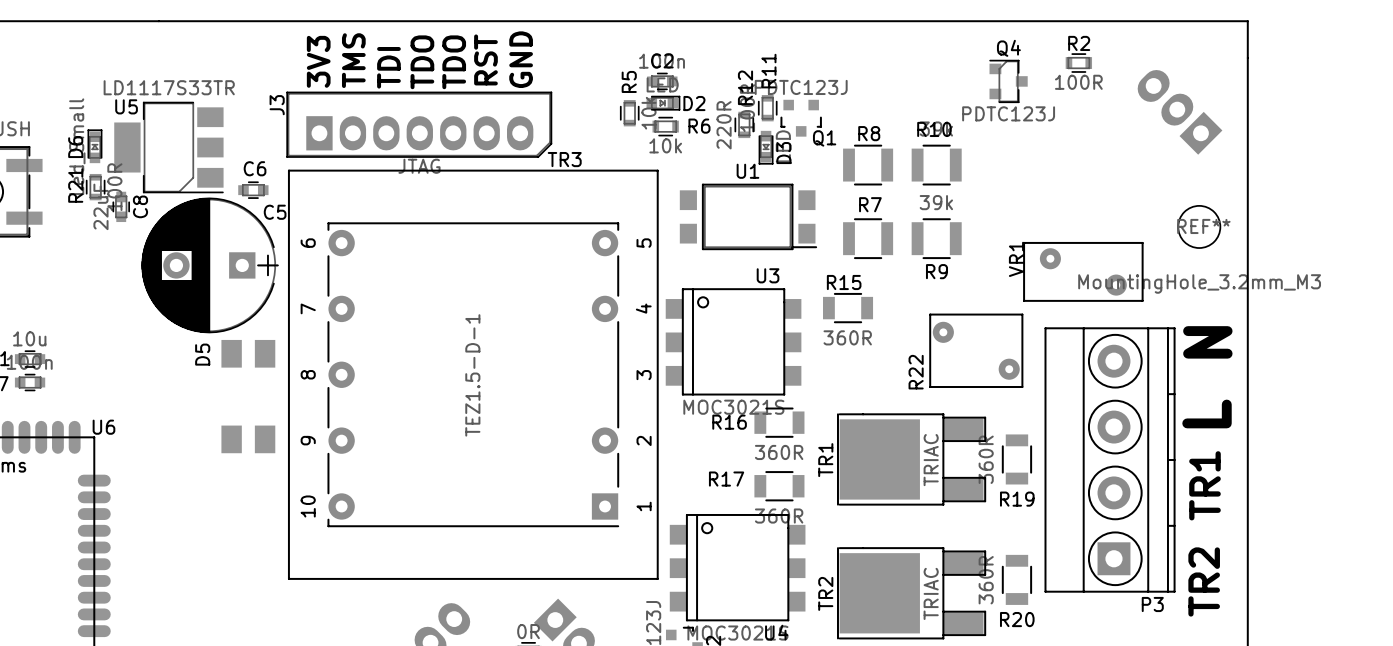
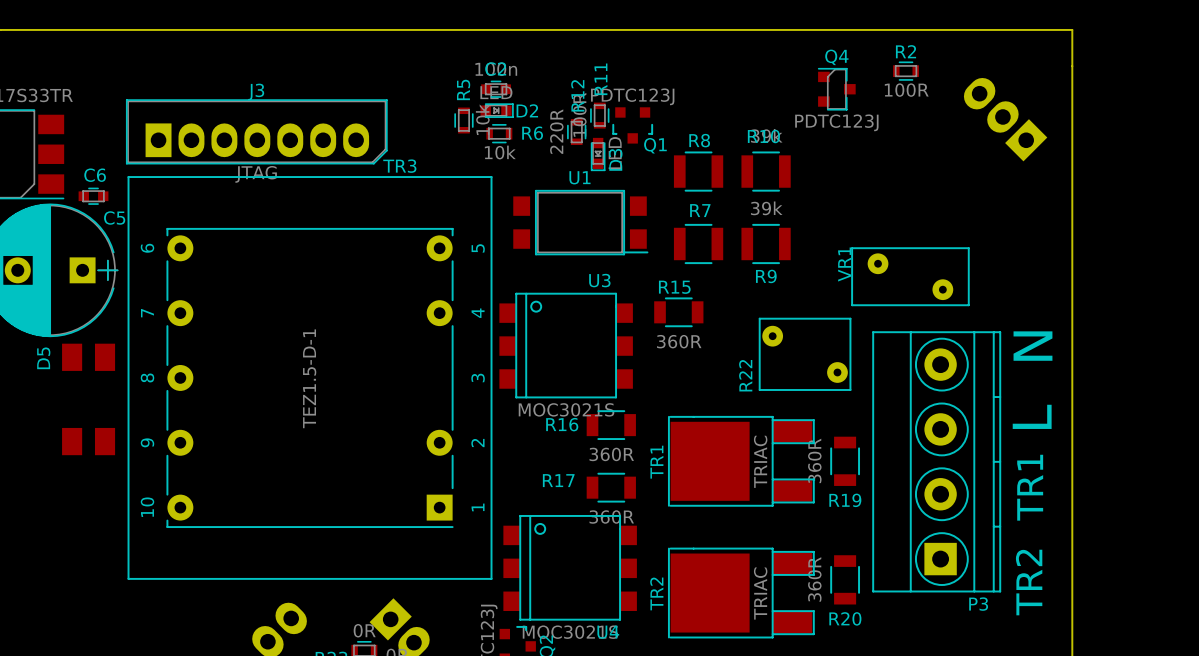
text: RST (485, 59) -> none
text: GND (521, 59) -> none
text: TMS (353, 60) -> none
text: 3V3 (318, 61) -> none
text: TDO (422, 62) -> none
text: TDO (454, 62) -> none
text: TDI (388, 67) -> none
J3 name rotation: 0° (277, 105) -> 90° clockwise (256, 92)
J3 name position: J3 (277, 105) -> J3 (256, 92)
REF**: MountingHole_3.2mm_M3 (1199, 226) -> none

